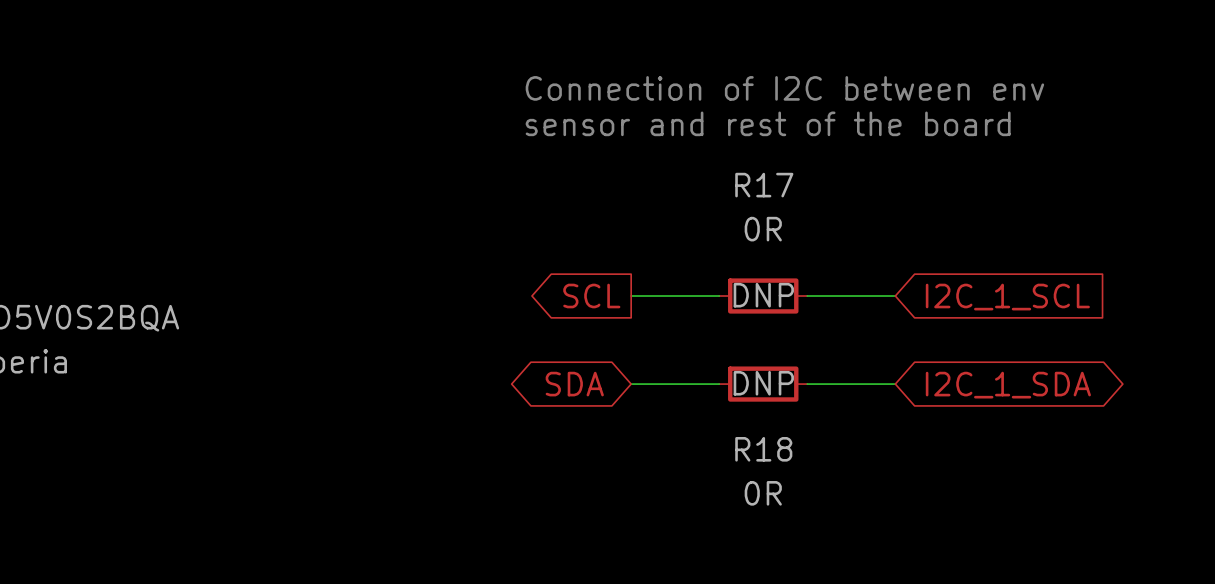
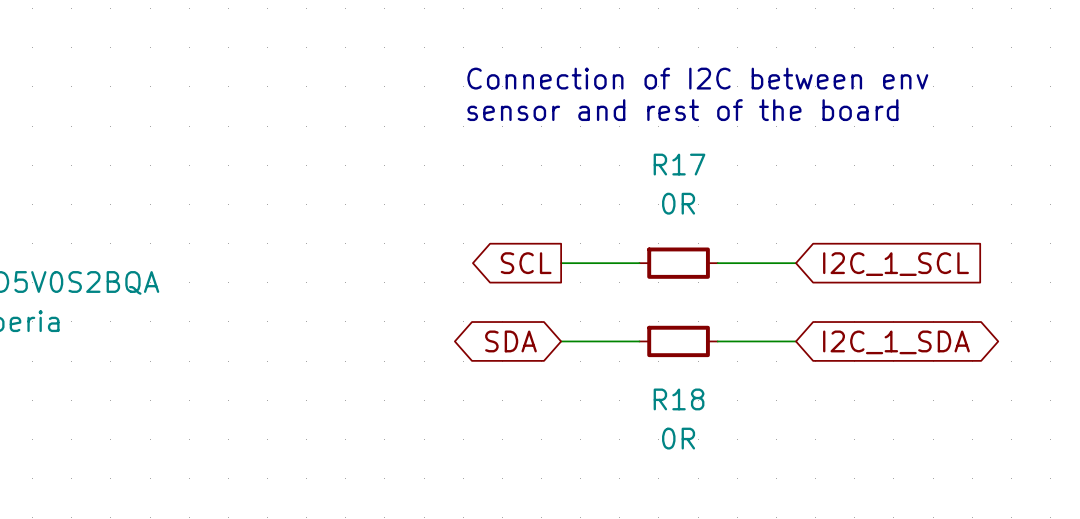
R17 text: DNP (763, 295) -> none
R18 text: DNP (763, 383) -> none

